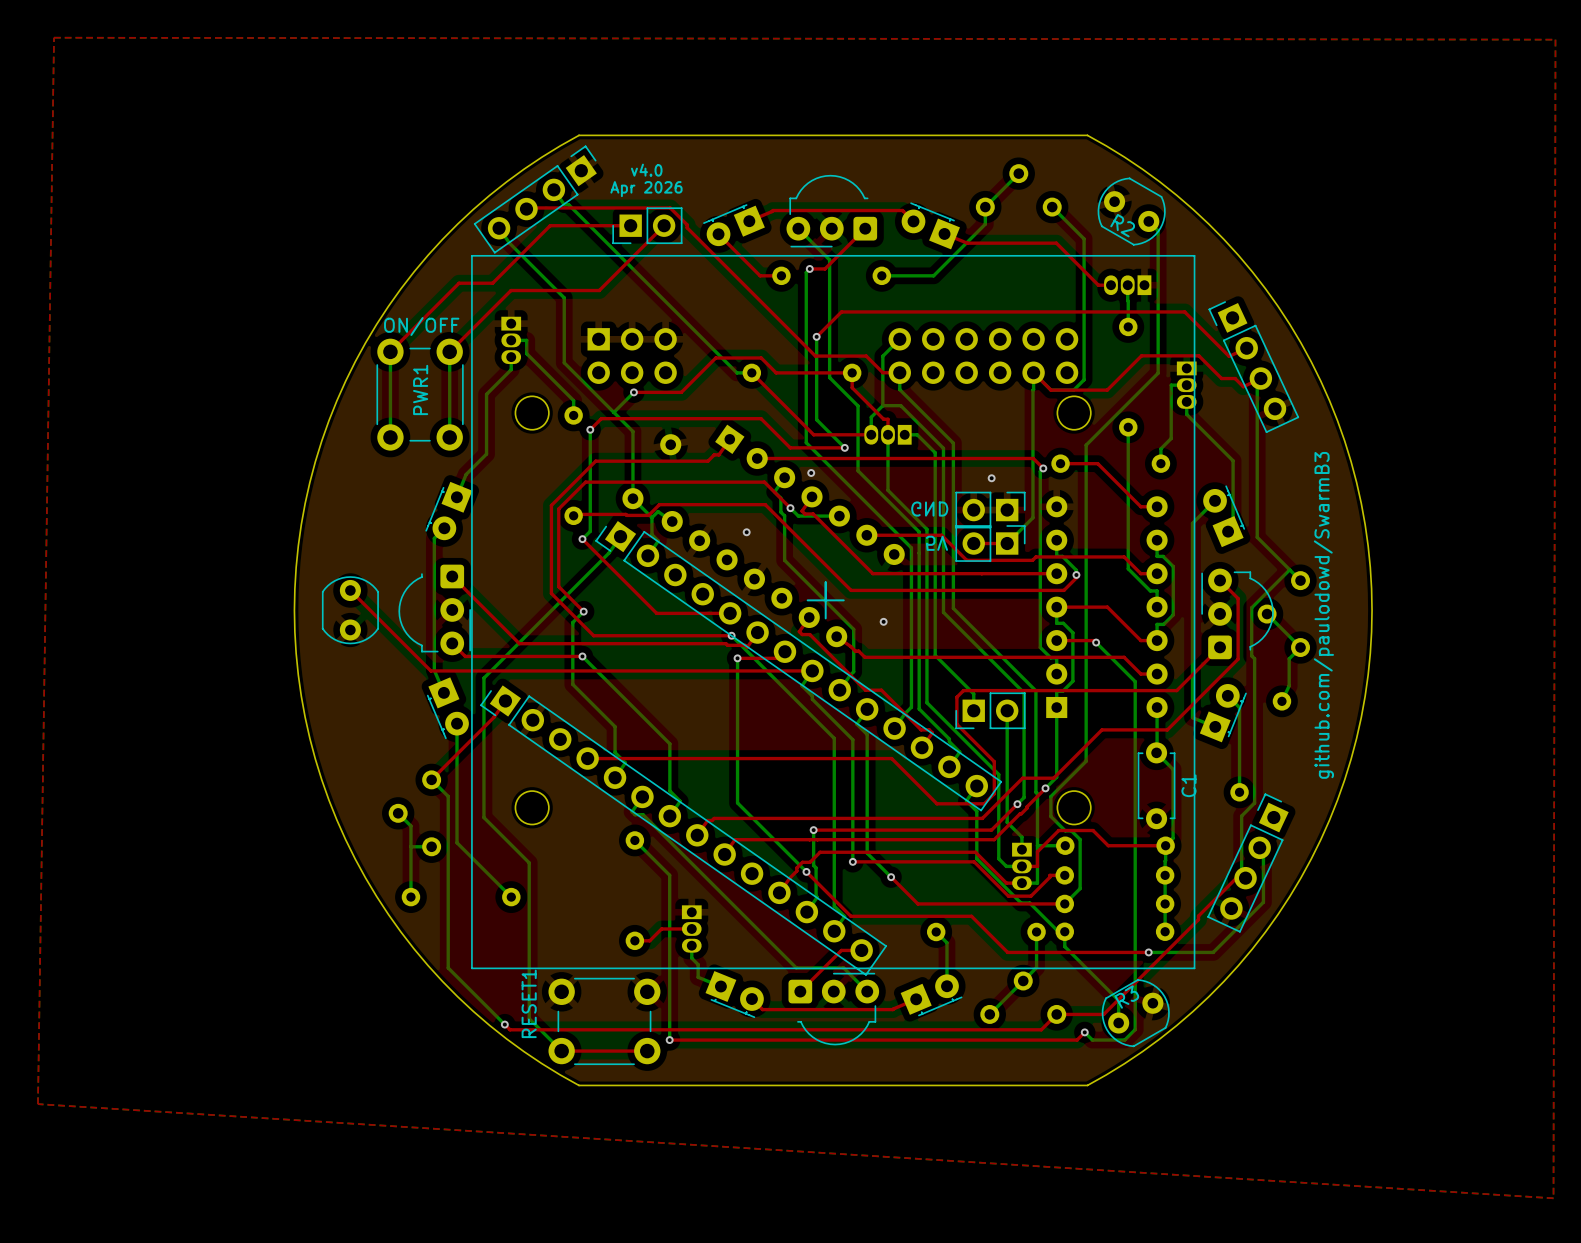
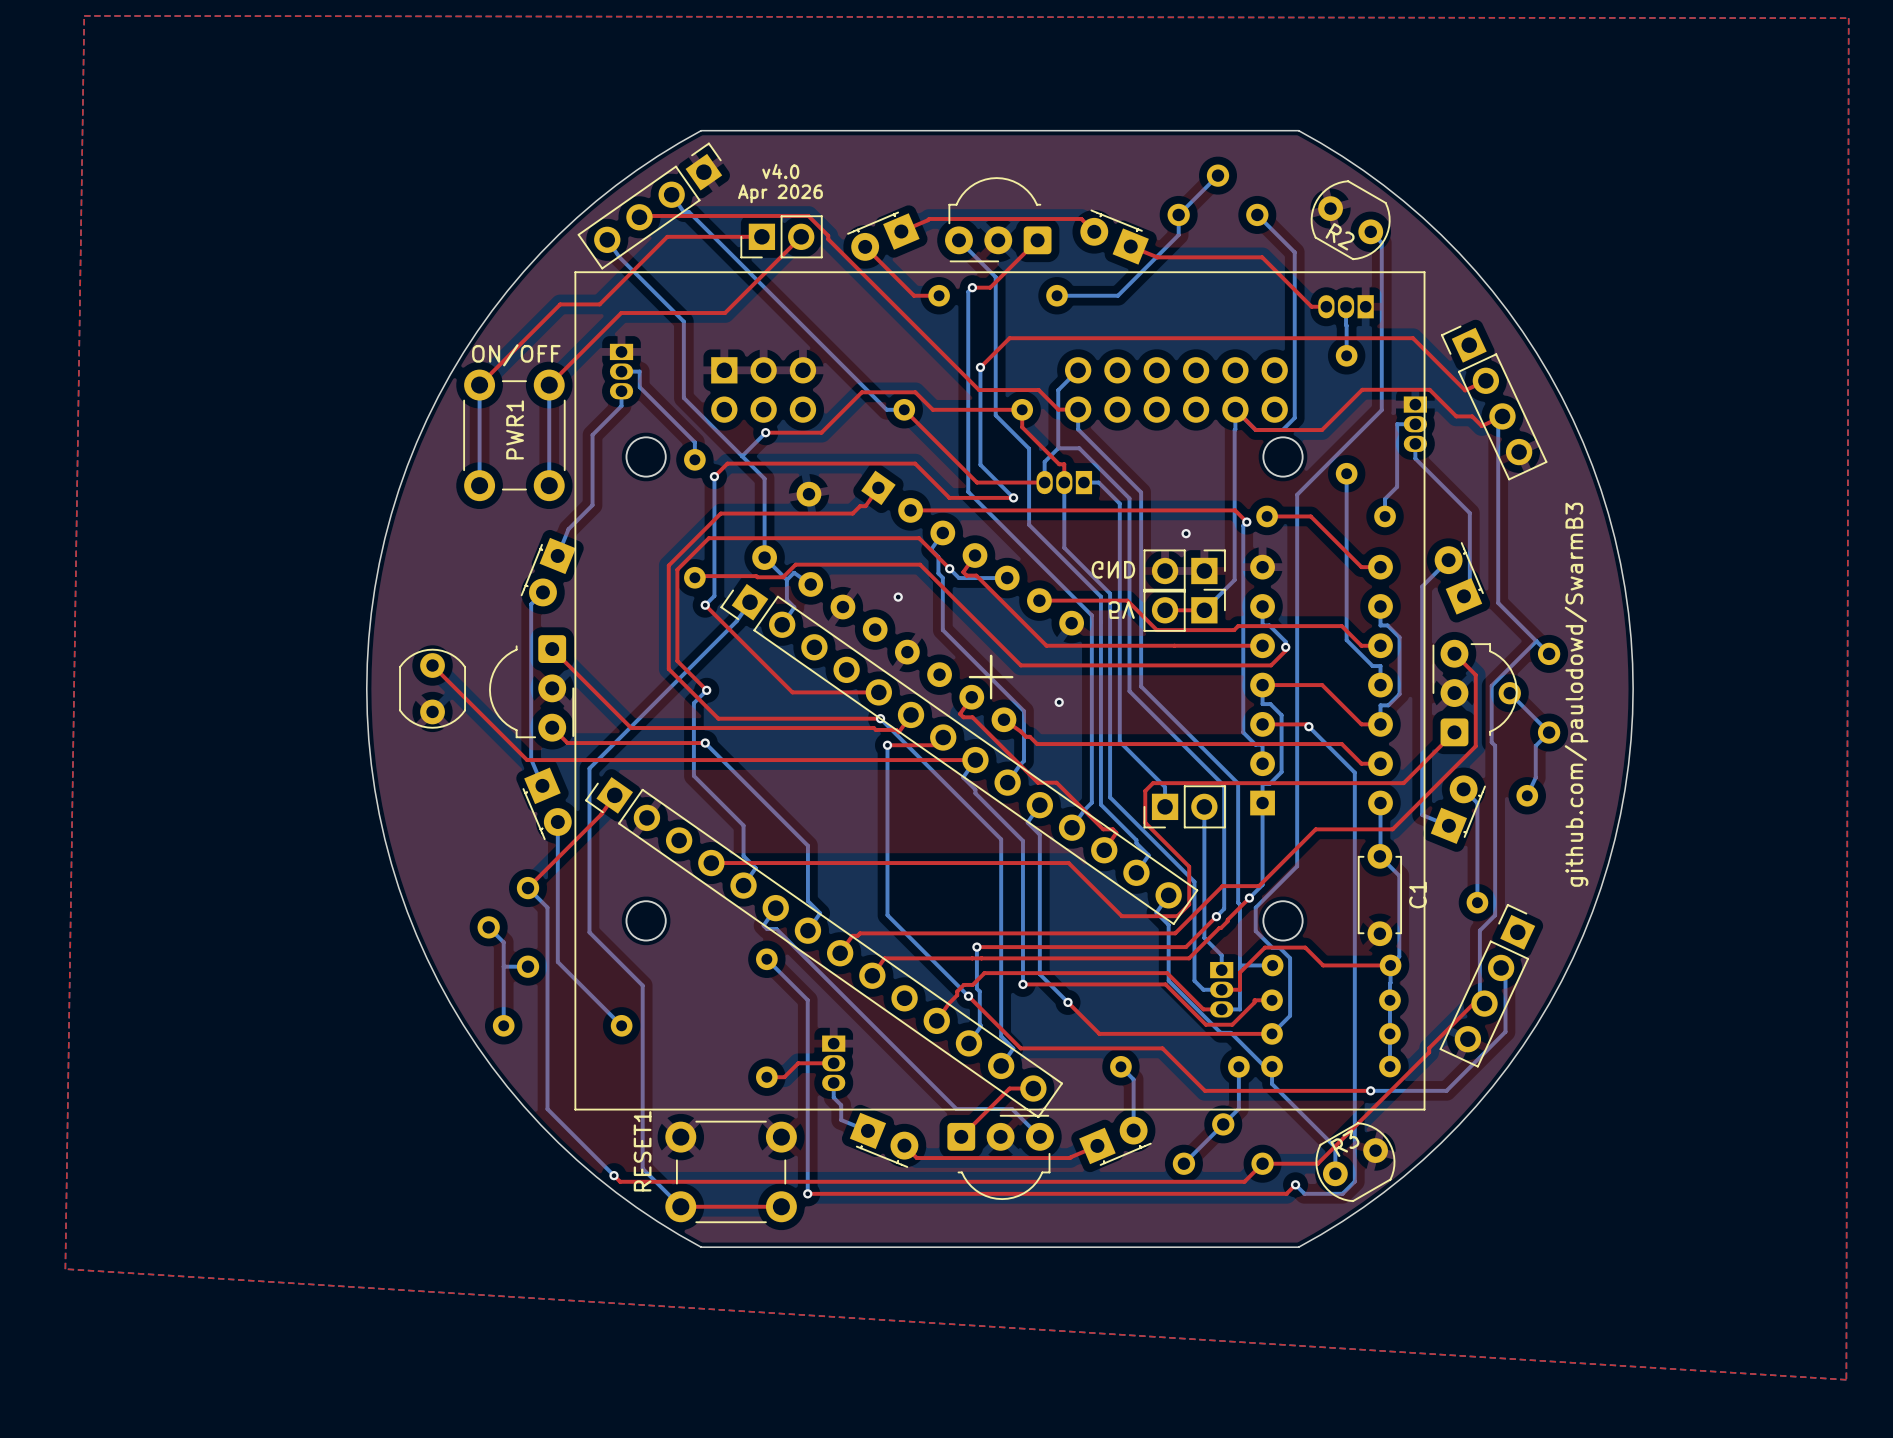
via: (811, 472) -> none

